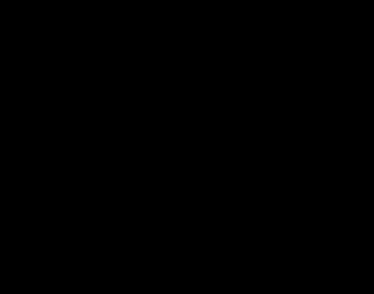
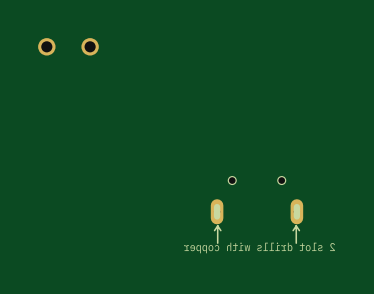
part: none -> (68, 46)
part: none -> (256, 210)

